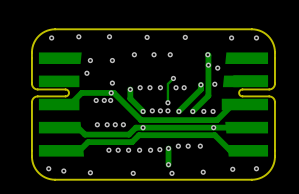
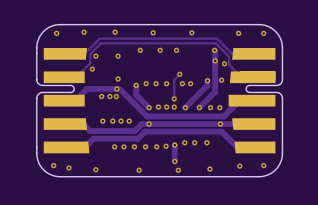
track: none -> (254, 53) (232, 53) (216, 38) (99, 38) (84, 53) (64, 53)
track: none -> (257, 77) (241, 77) (229, 64) (229, 56) (215, 43) (100, 43) (90, 53) (90, 63) (76, 77) (64, 77)

